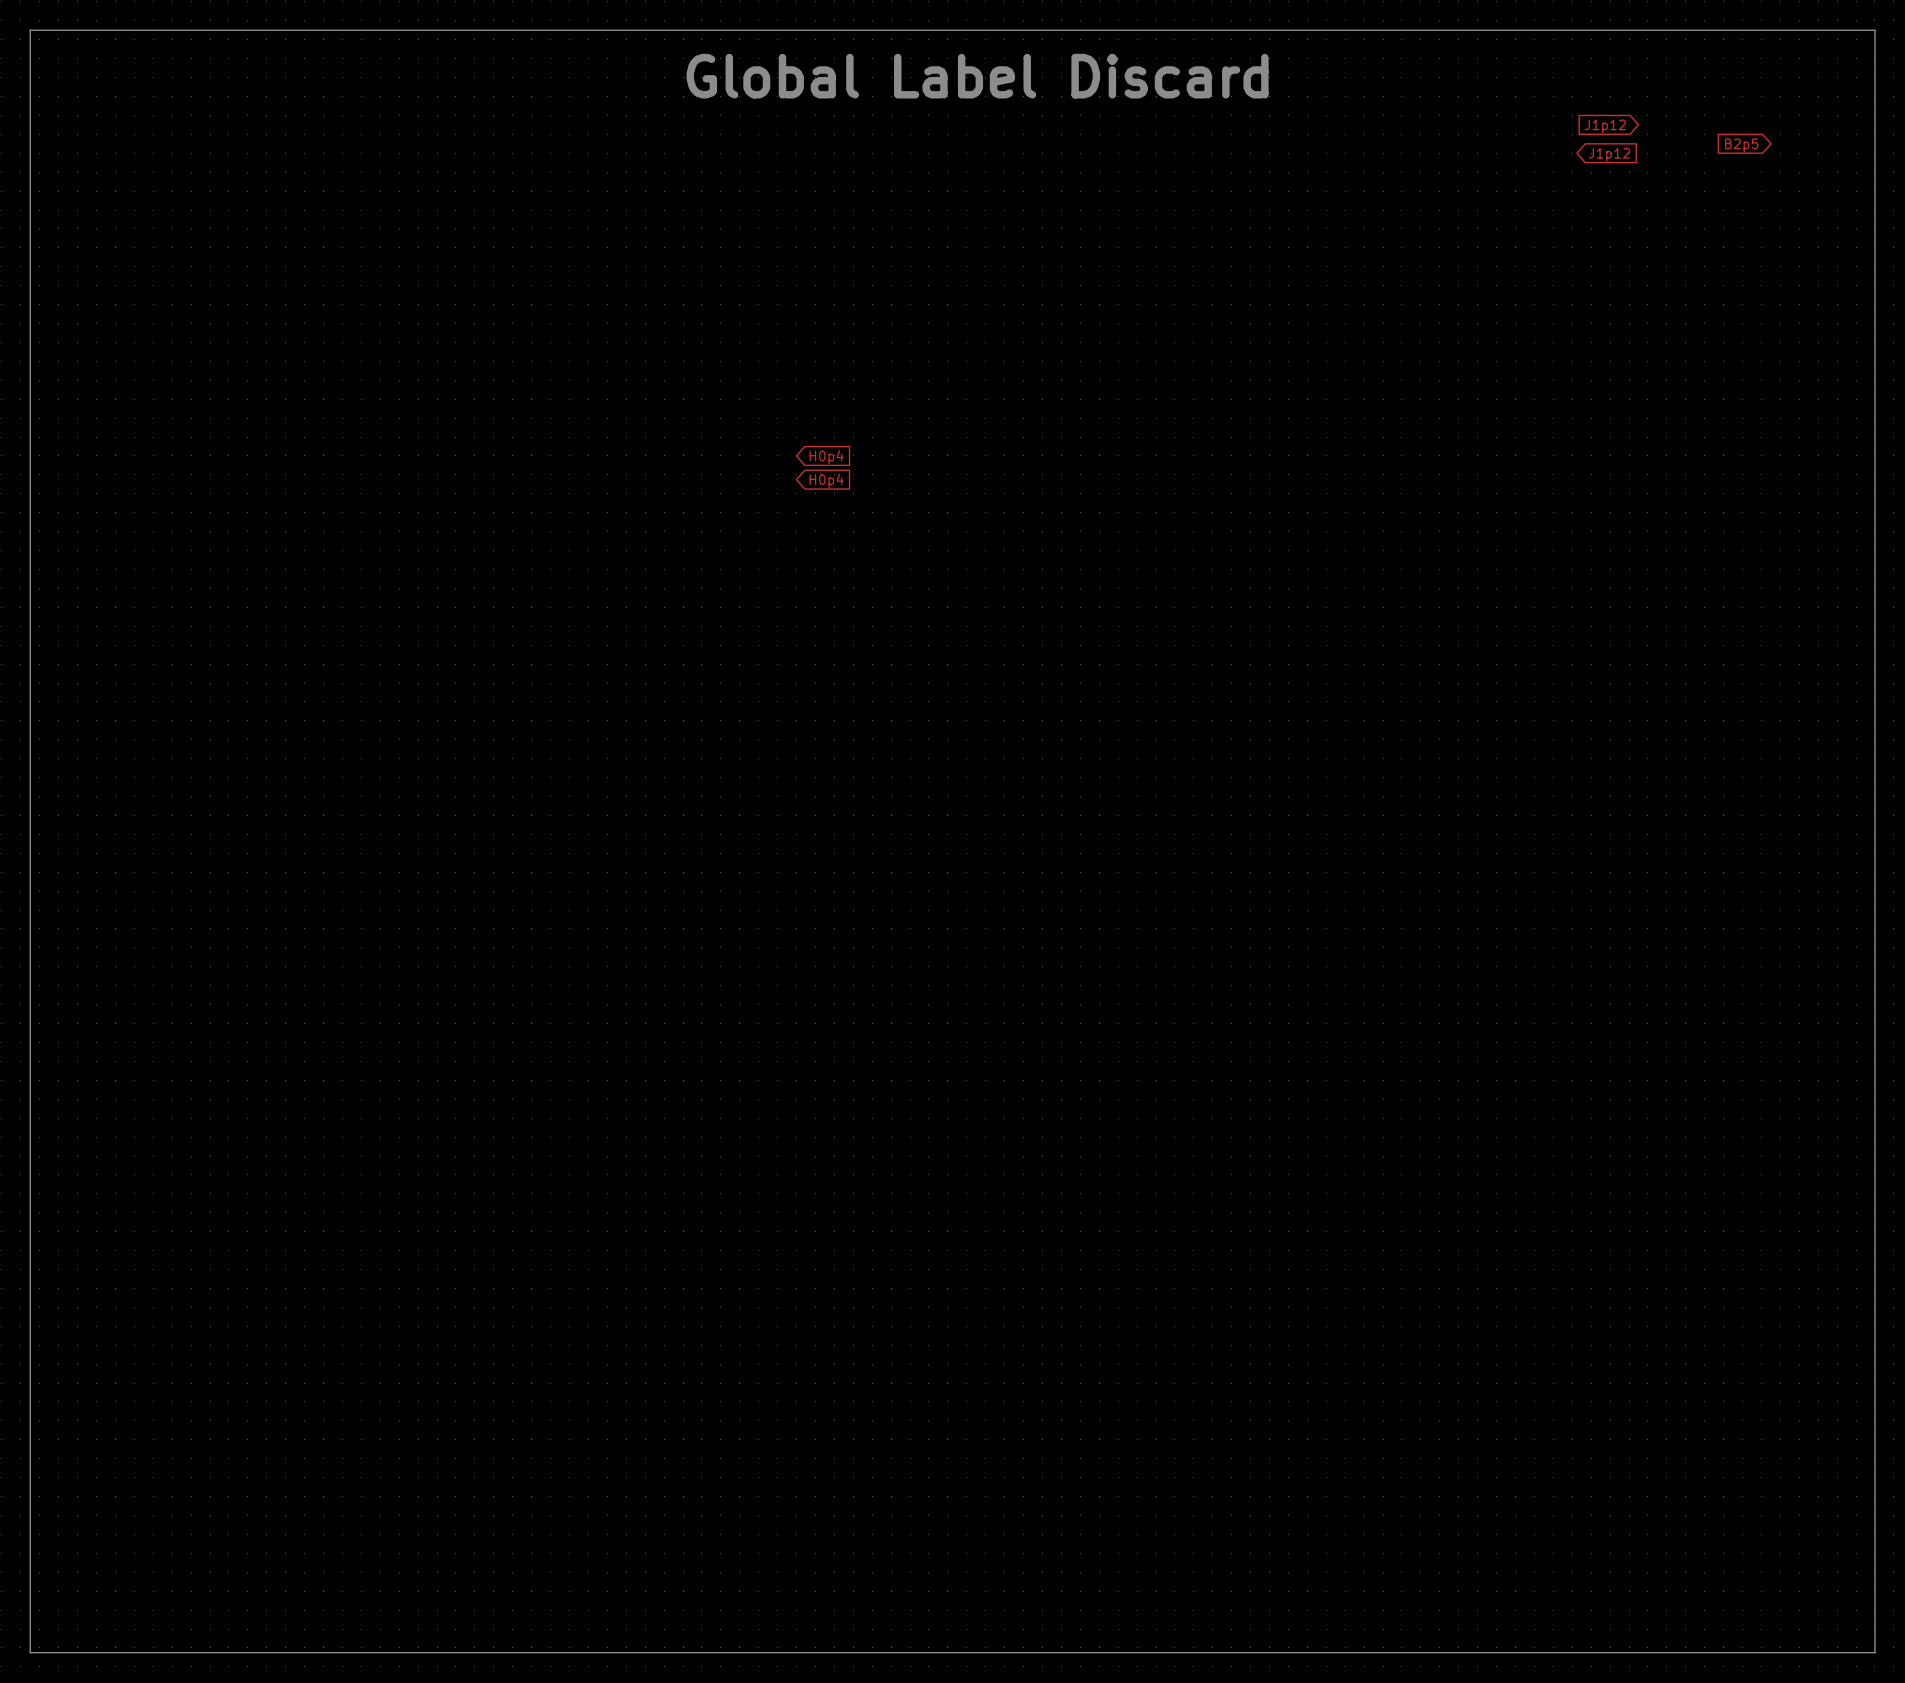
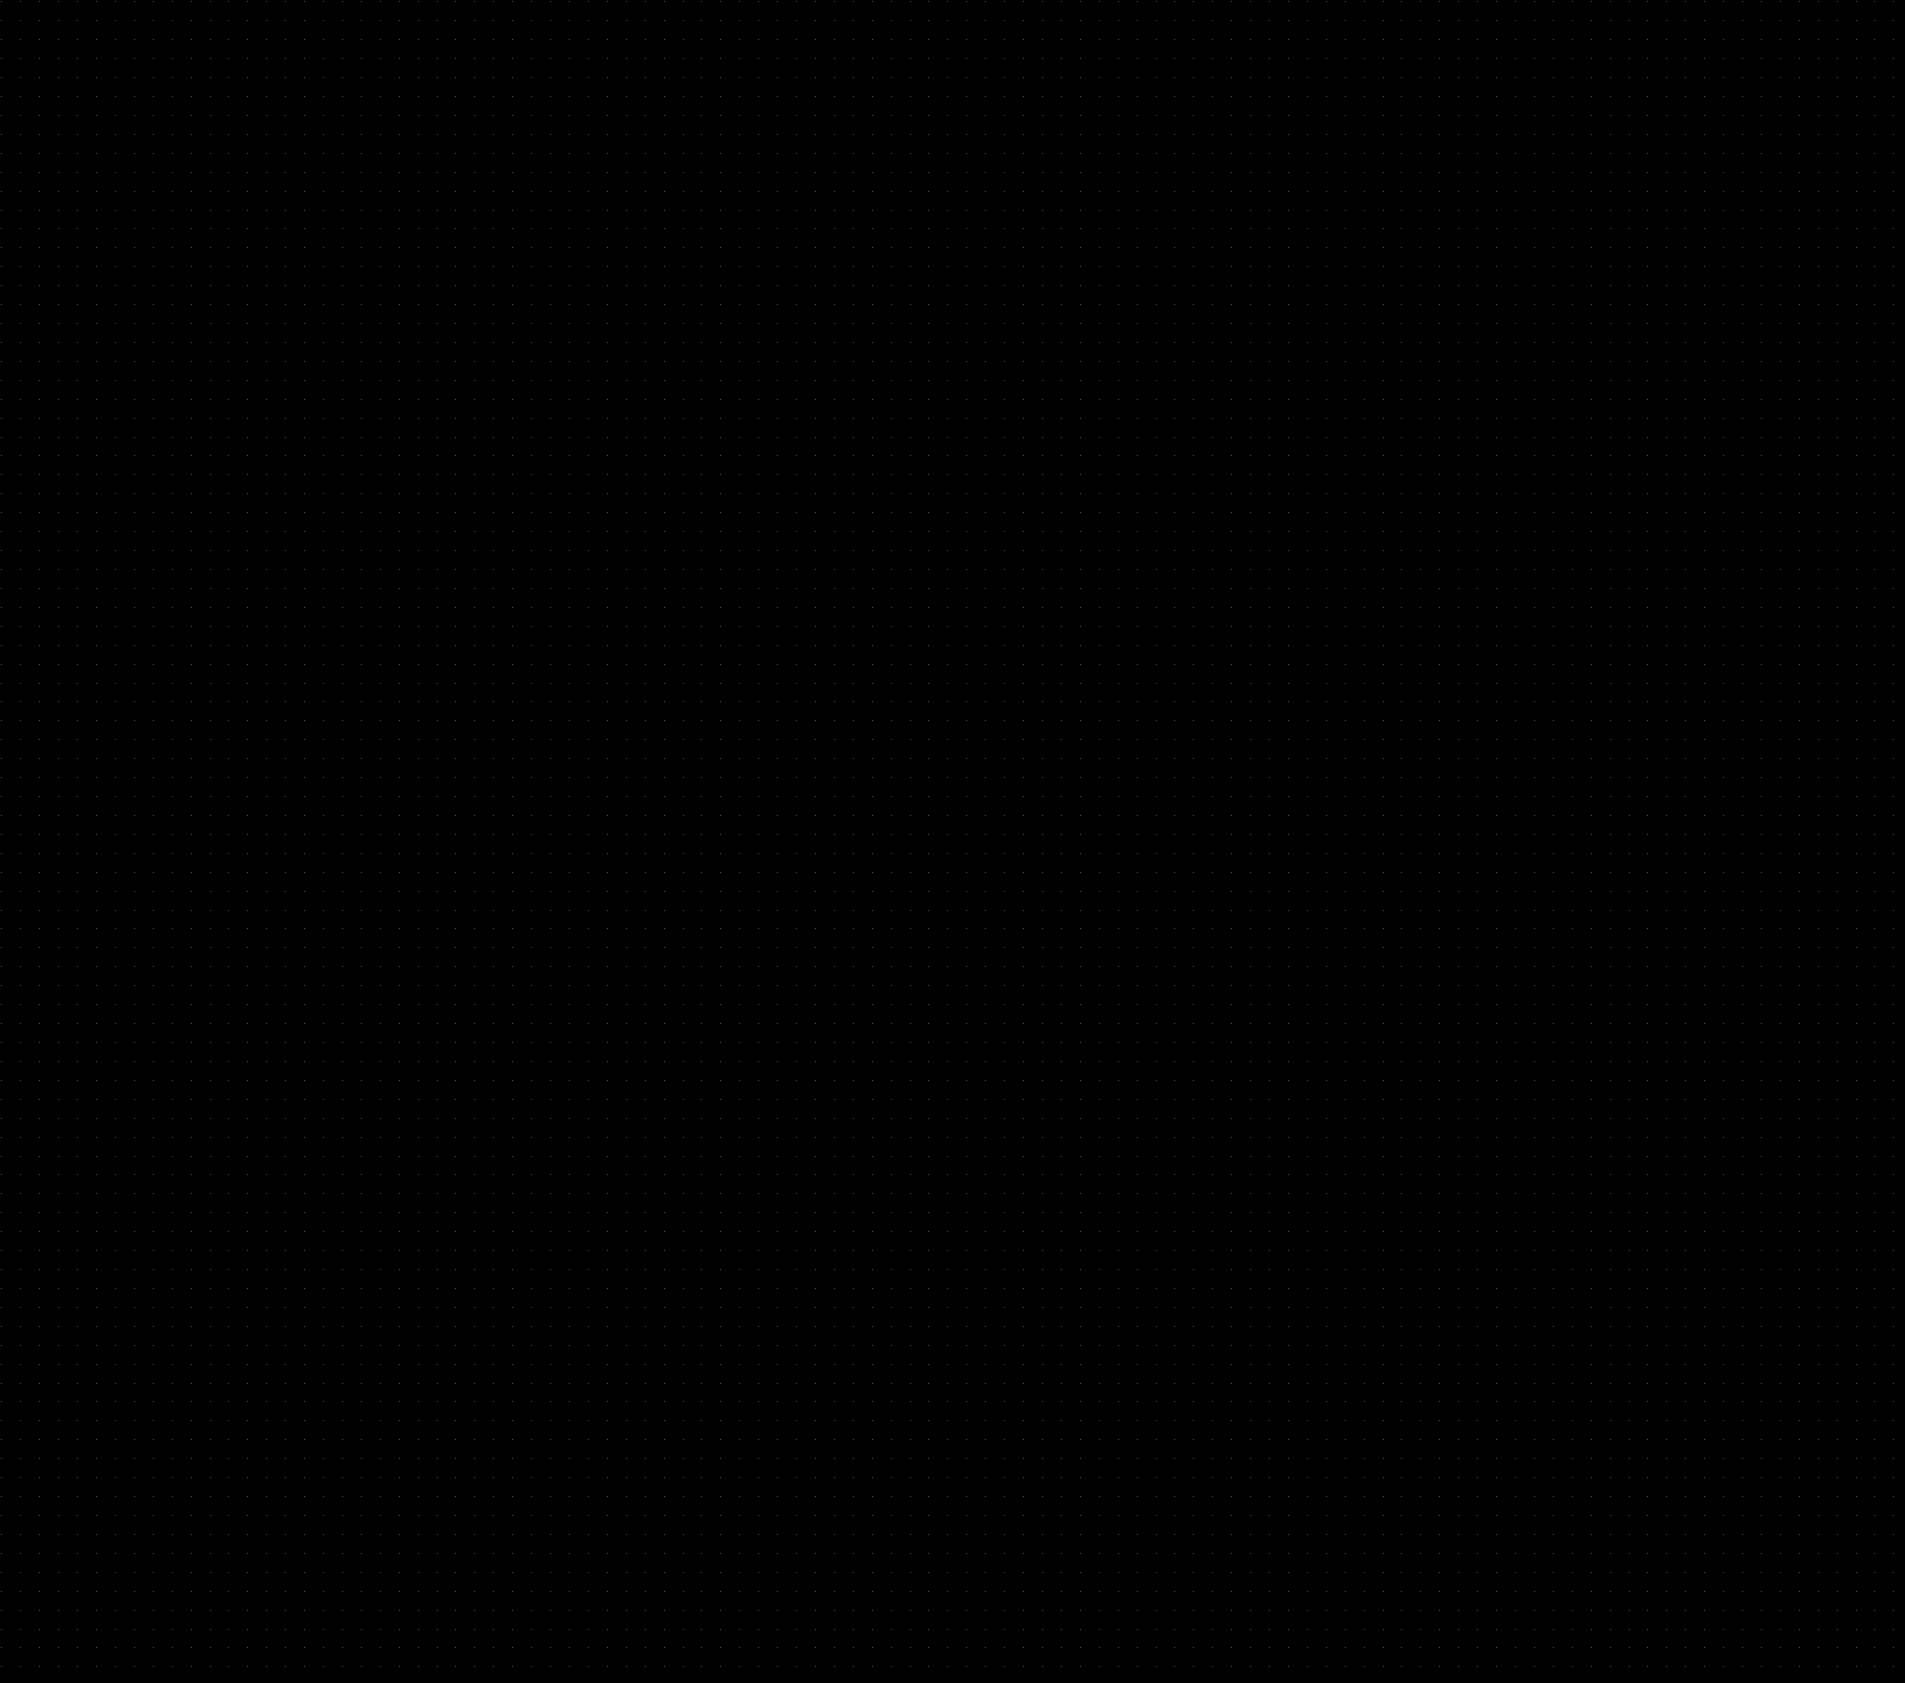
line: (30, 30) (1874, 30) (1874, 1652) (30, 1652) (30, 30) -> none
text: Global Label Discard (977, 76) -> none
global label: J1p12 (1605, 126) -> none
global label: B2p5 (1741, 145) -> none
global label: J1p12 (1609, 154) -> none
global label: H0p4 (826, 457) -> none
global label: H0p4 (826, 480) -> none

